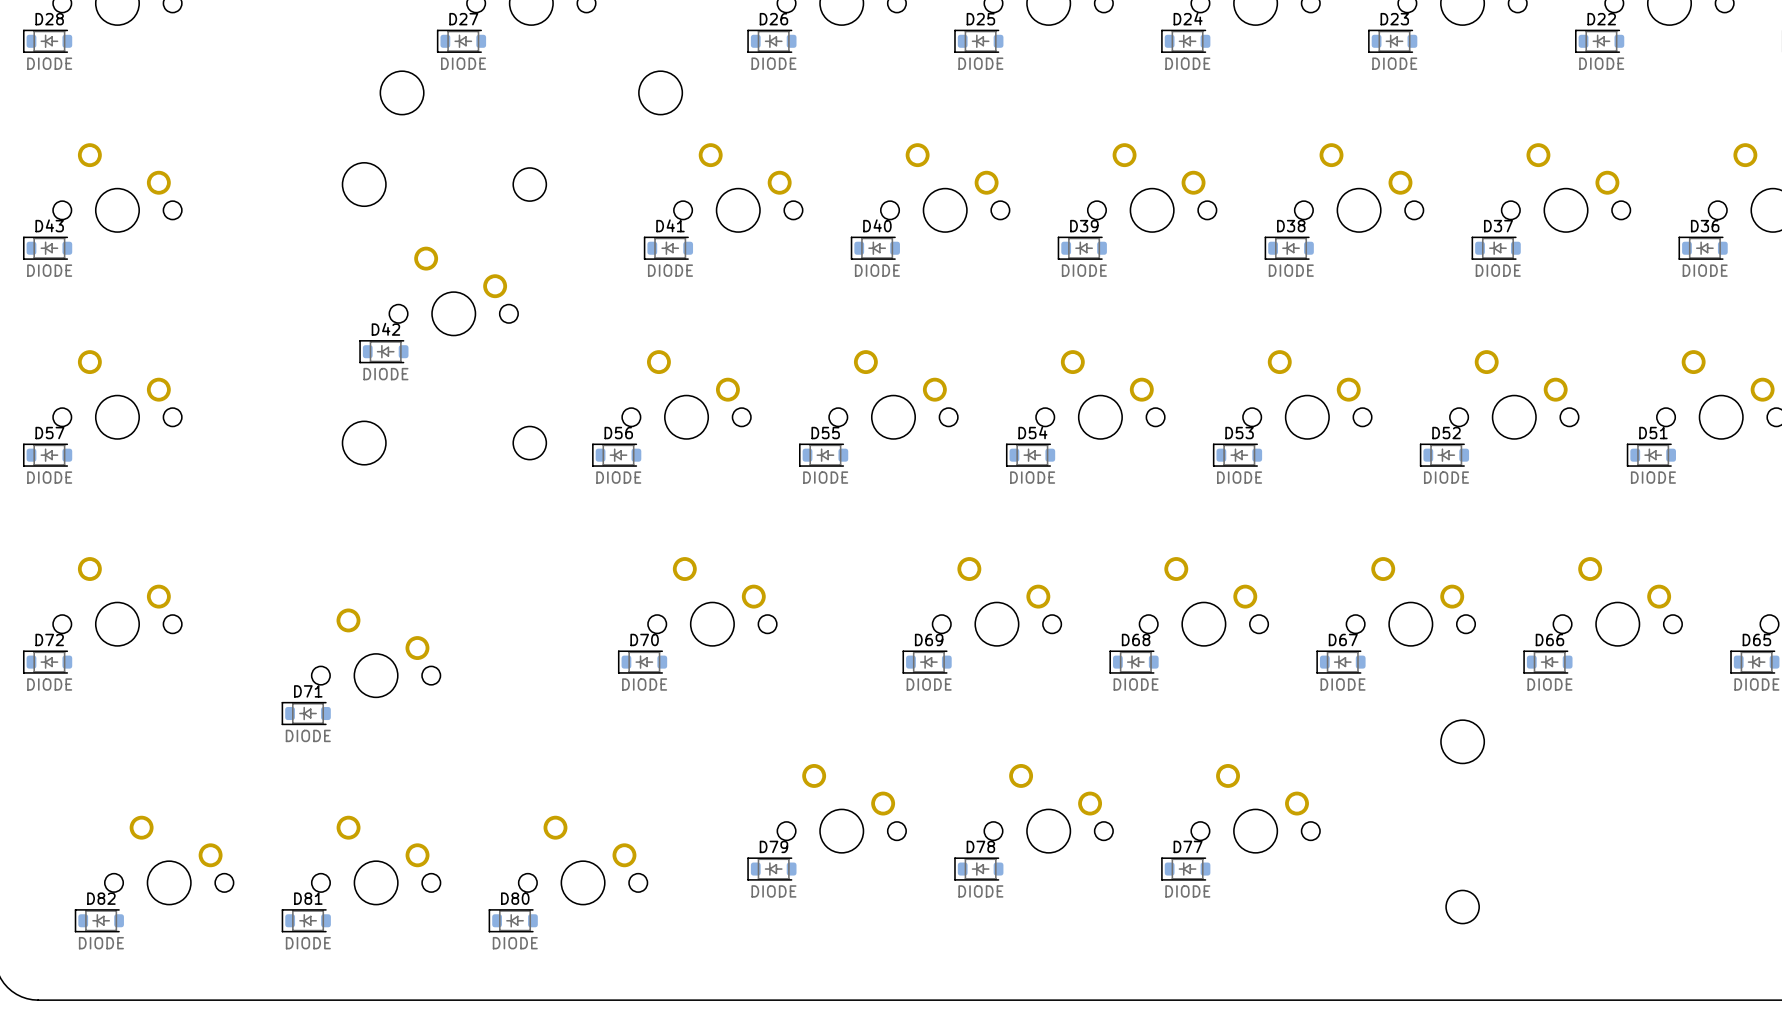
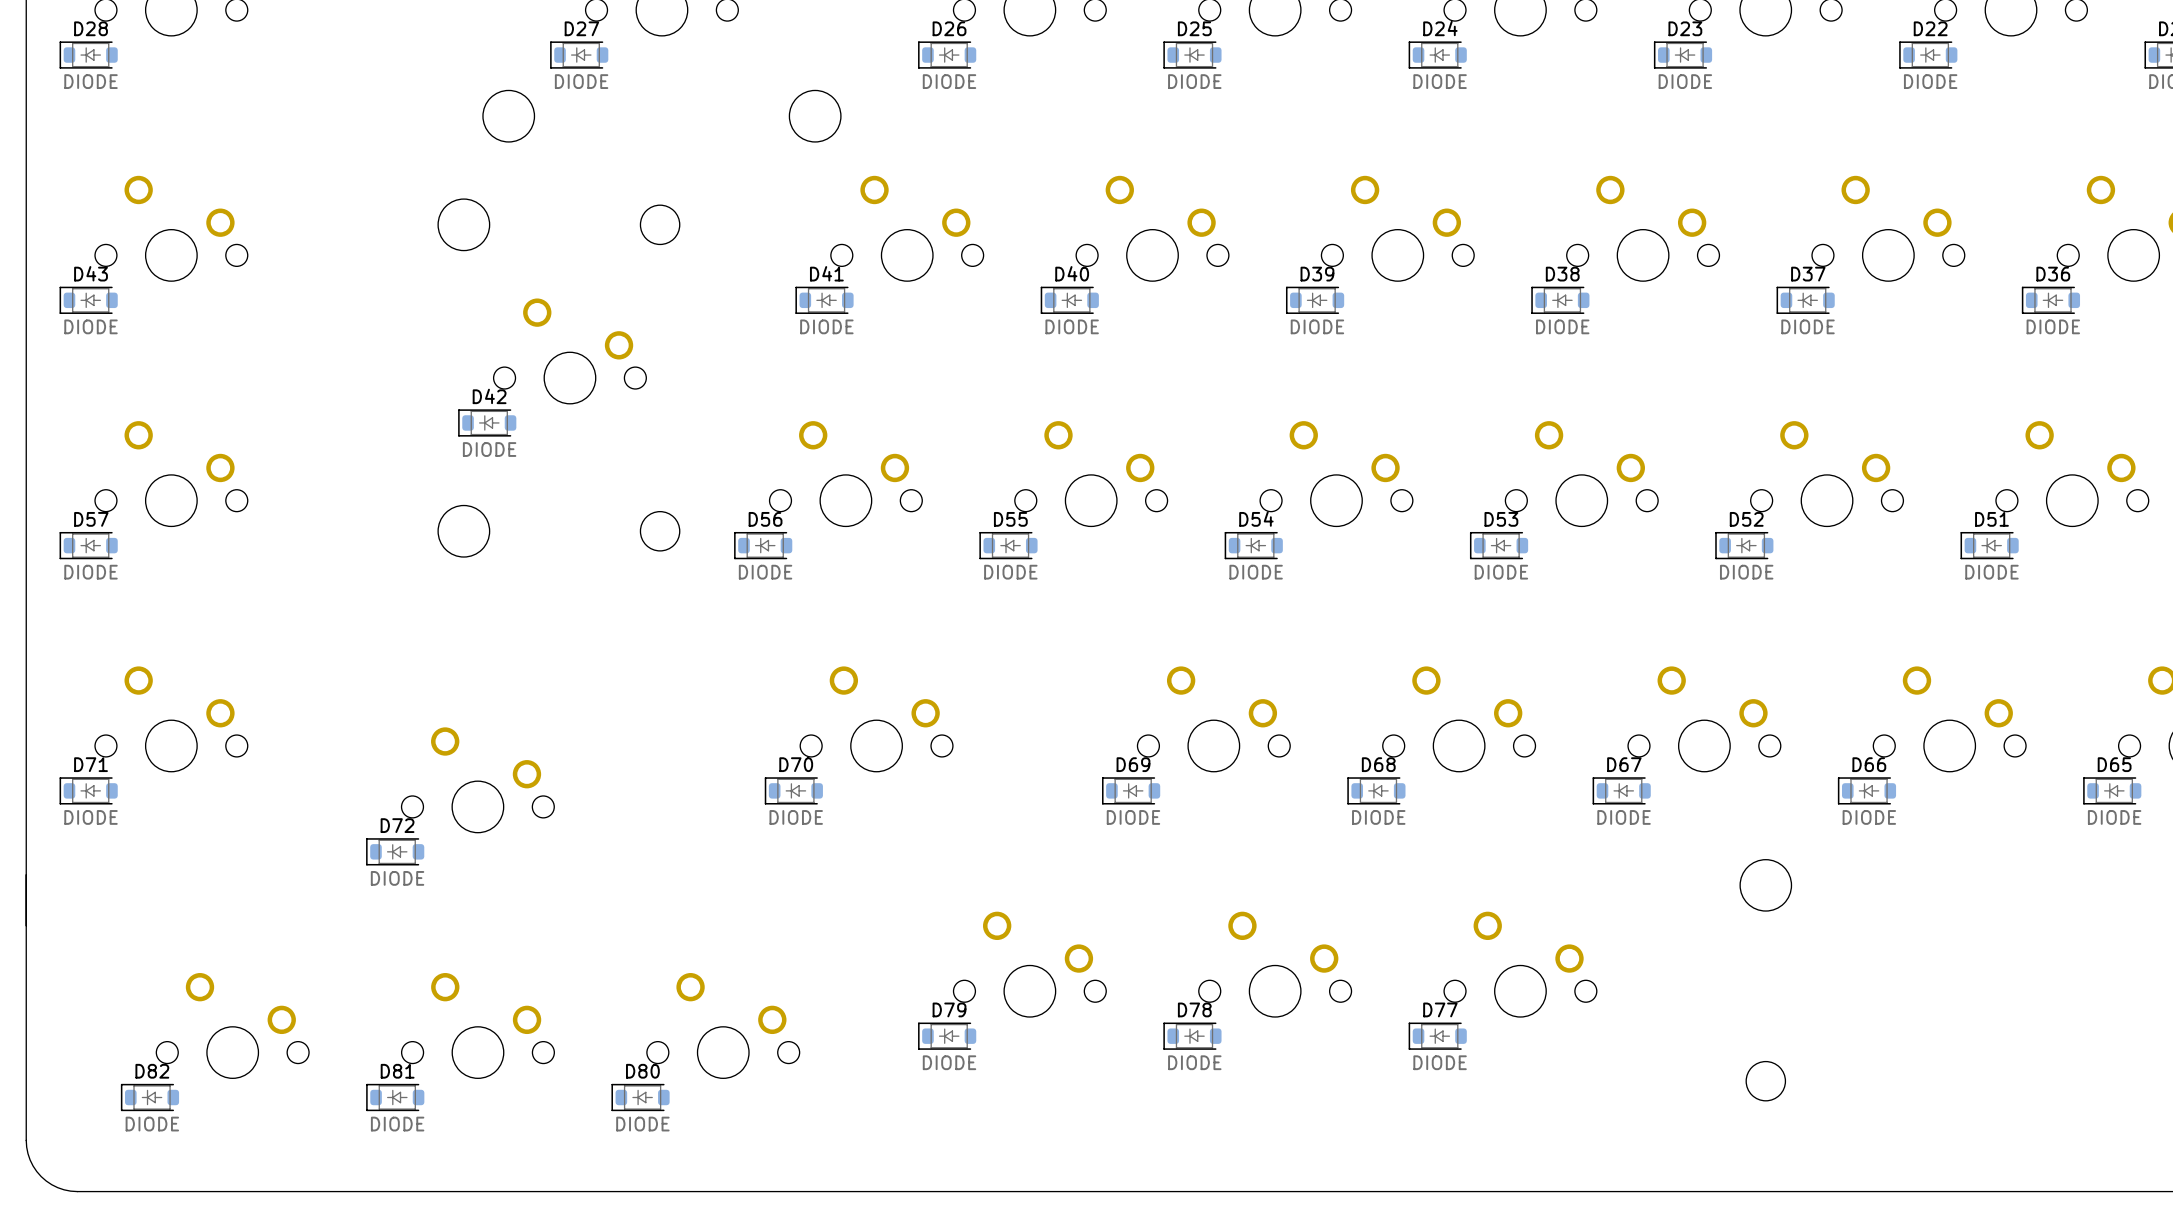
D72 name: D72 (49, 639) -> D71 (91, 764)
D71 name: D71 (308, 691) -> D72 (397, 825)

